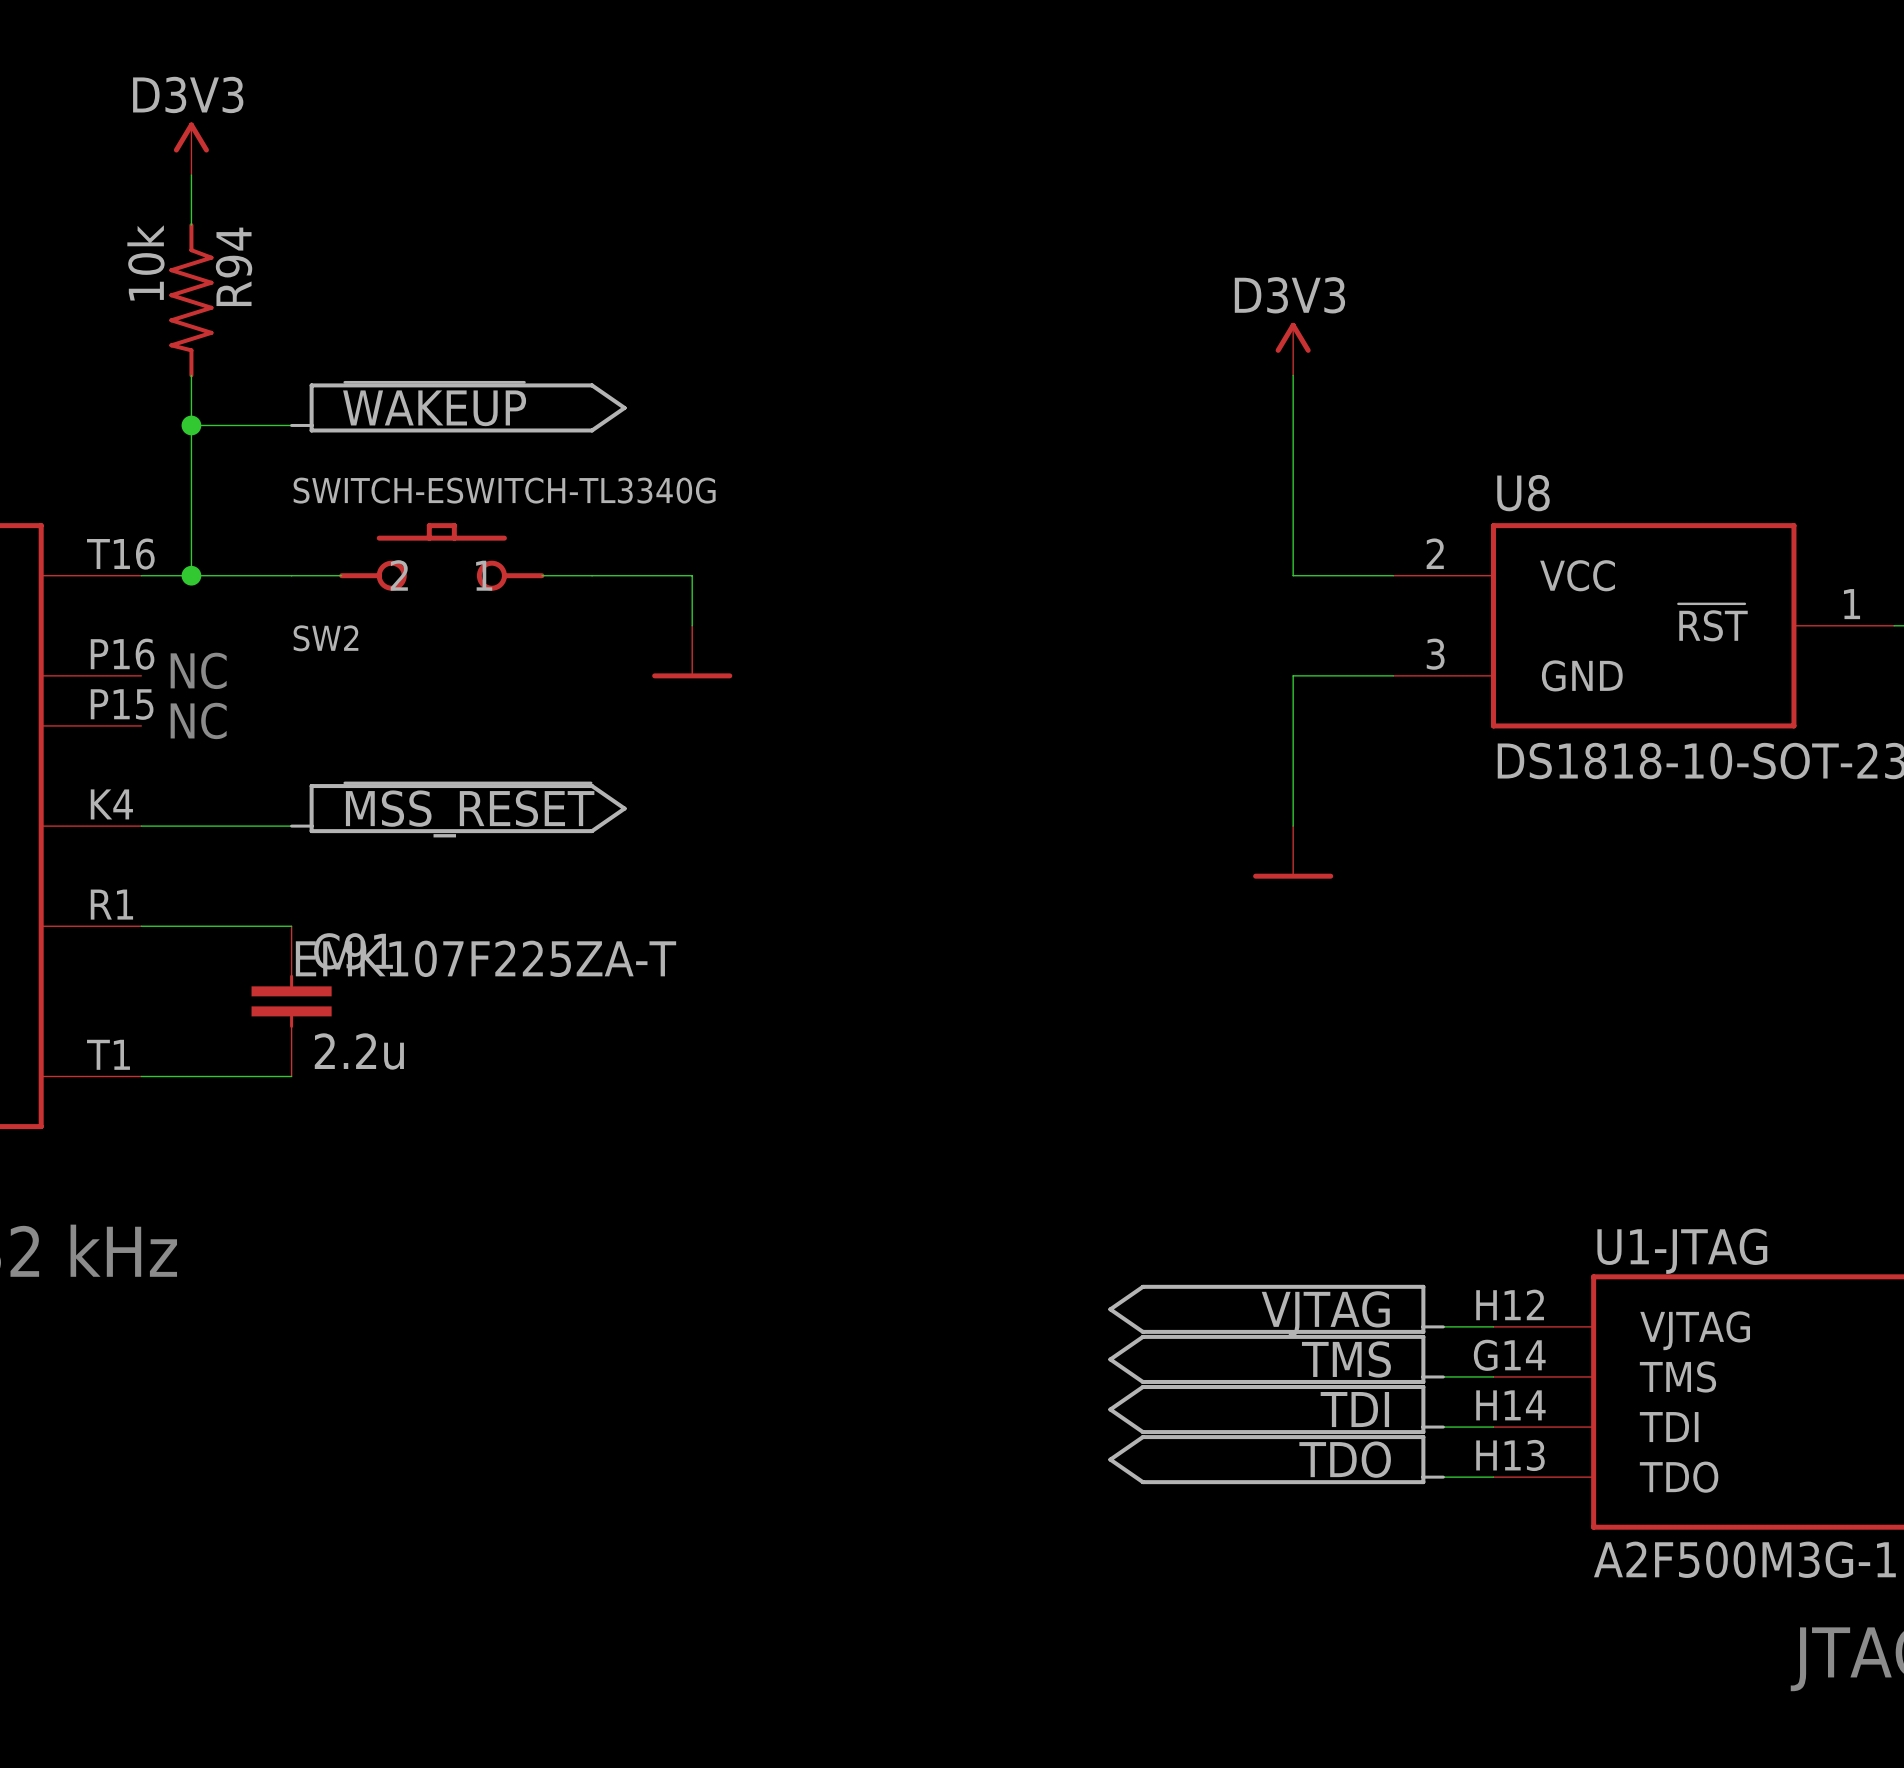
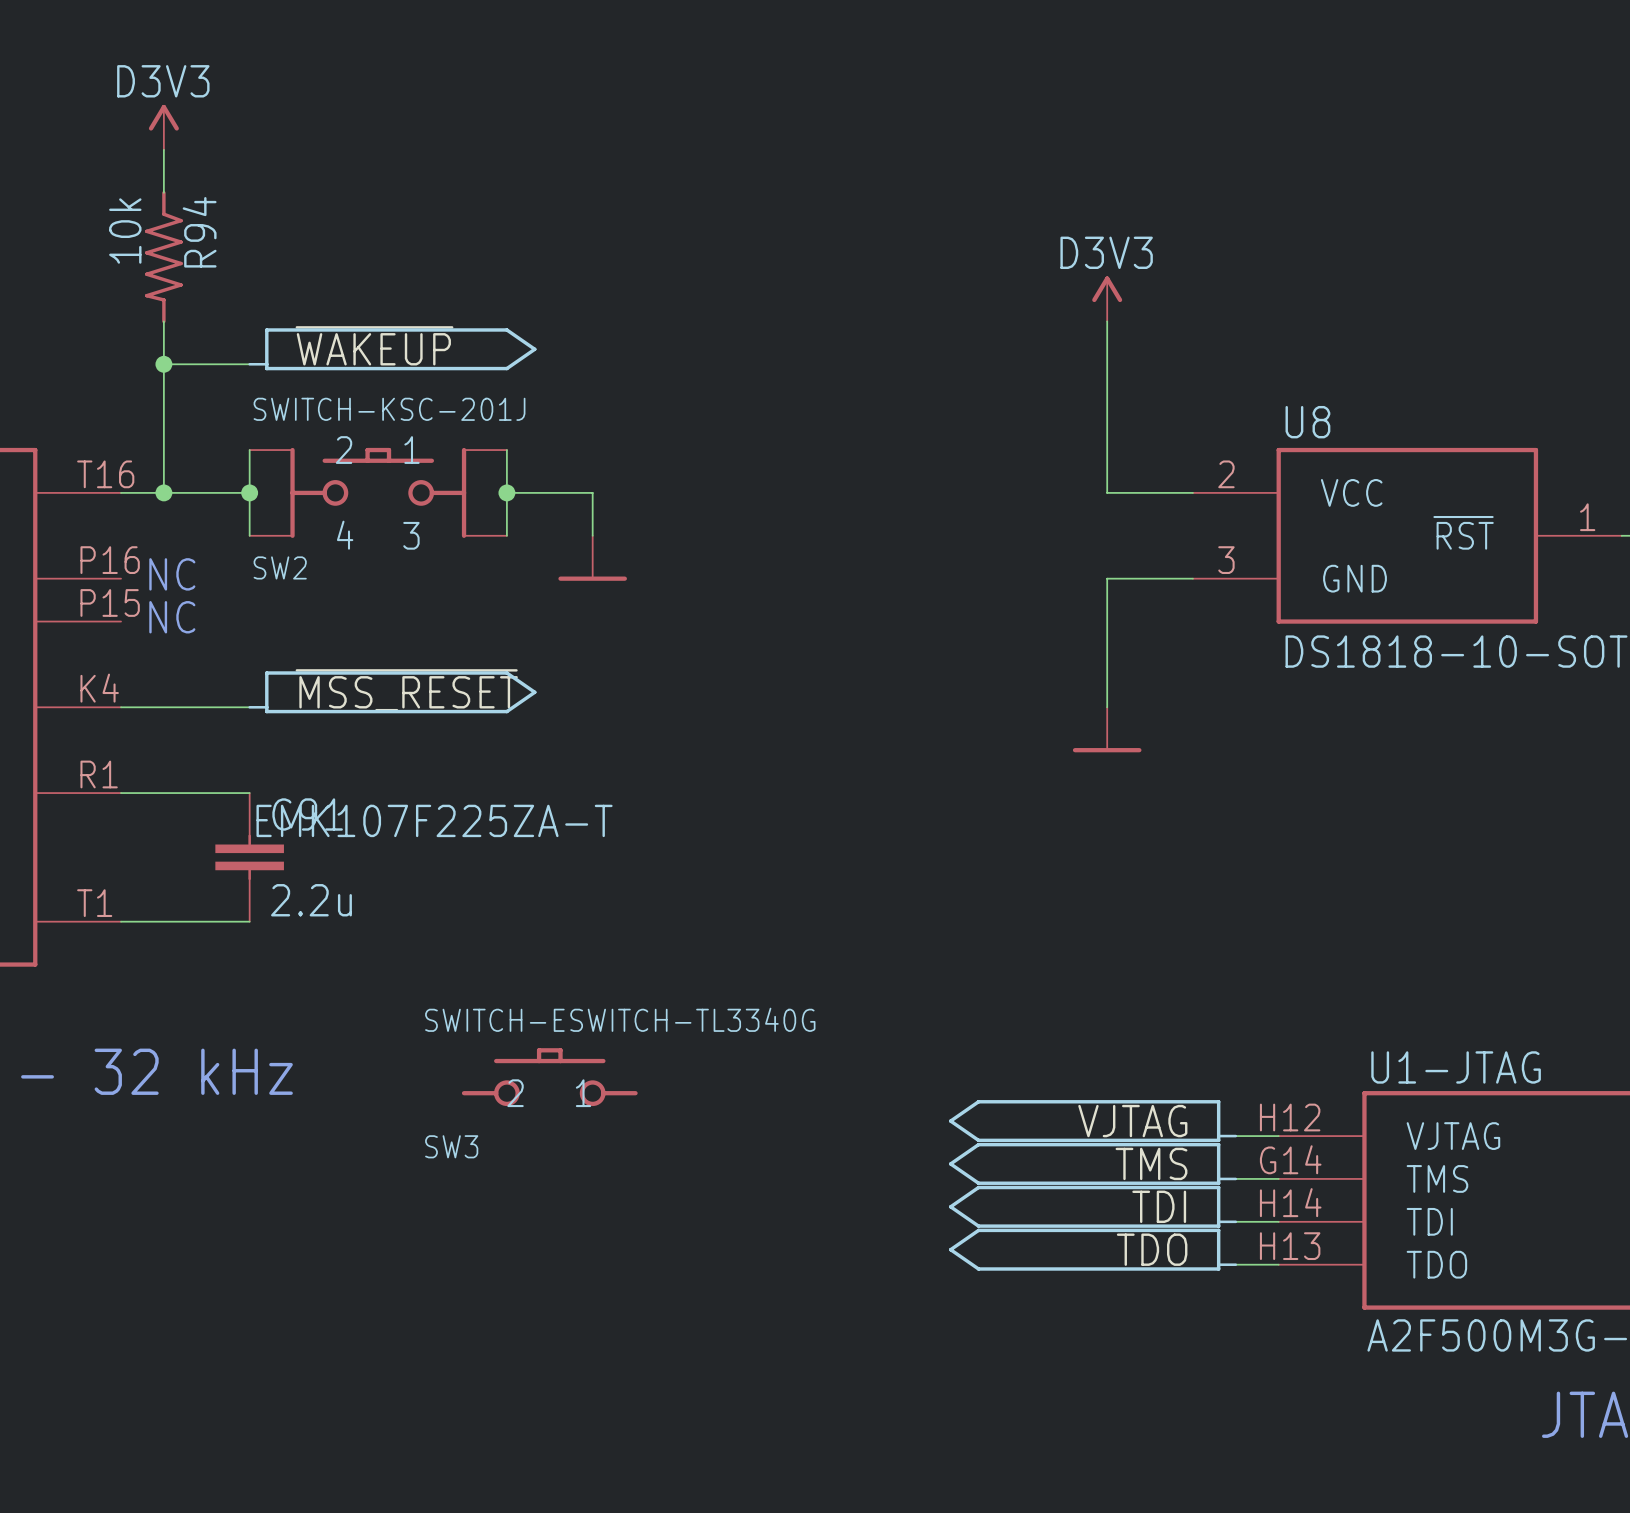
SW2 value: SWITCH-ESWITCH-TL3340G (504, 490) -> SWITCH-KSC-201J (389, 409)
SW2 symbol: [339, 523, 545, 591] -> [249, 447, 507, 538]
wire: none -> (249, 450) (249, 535)
wire: none -> (506, 450) (506, 535)
wire: (291, 575) (341, 575) -> none
junction: none -> (249, 492)
wire: (541, 575) (592, 575) -> none
junction: none -> (506, 492)
SW3: none -> SWITCH-ESWITCH-TL3340G (549, 1077)

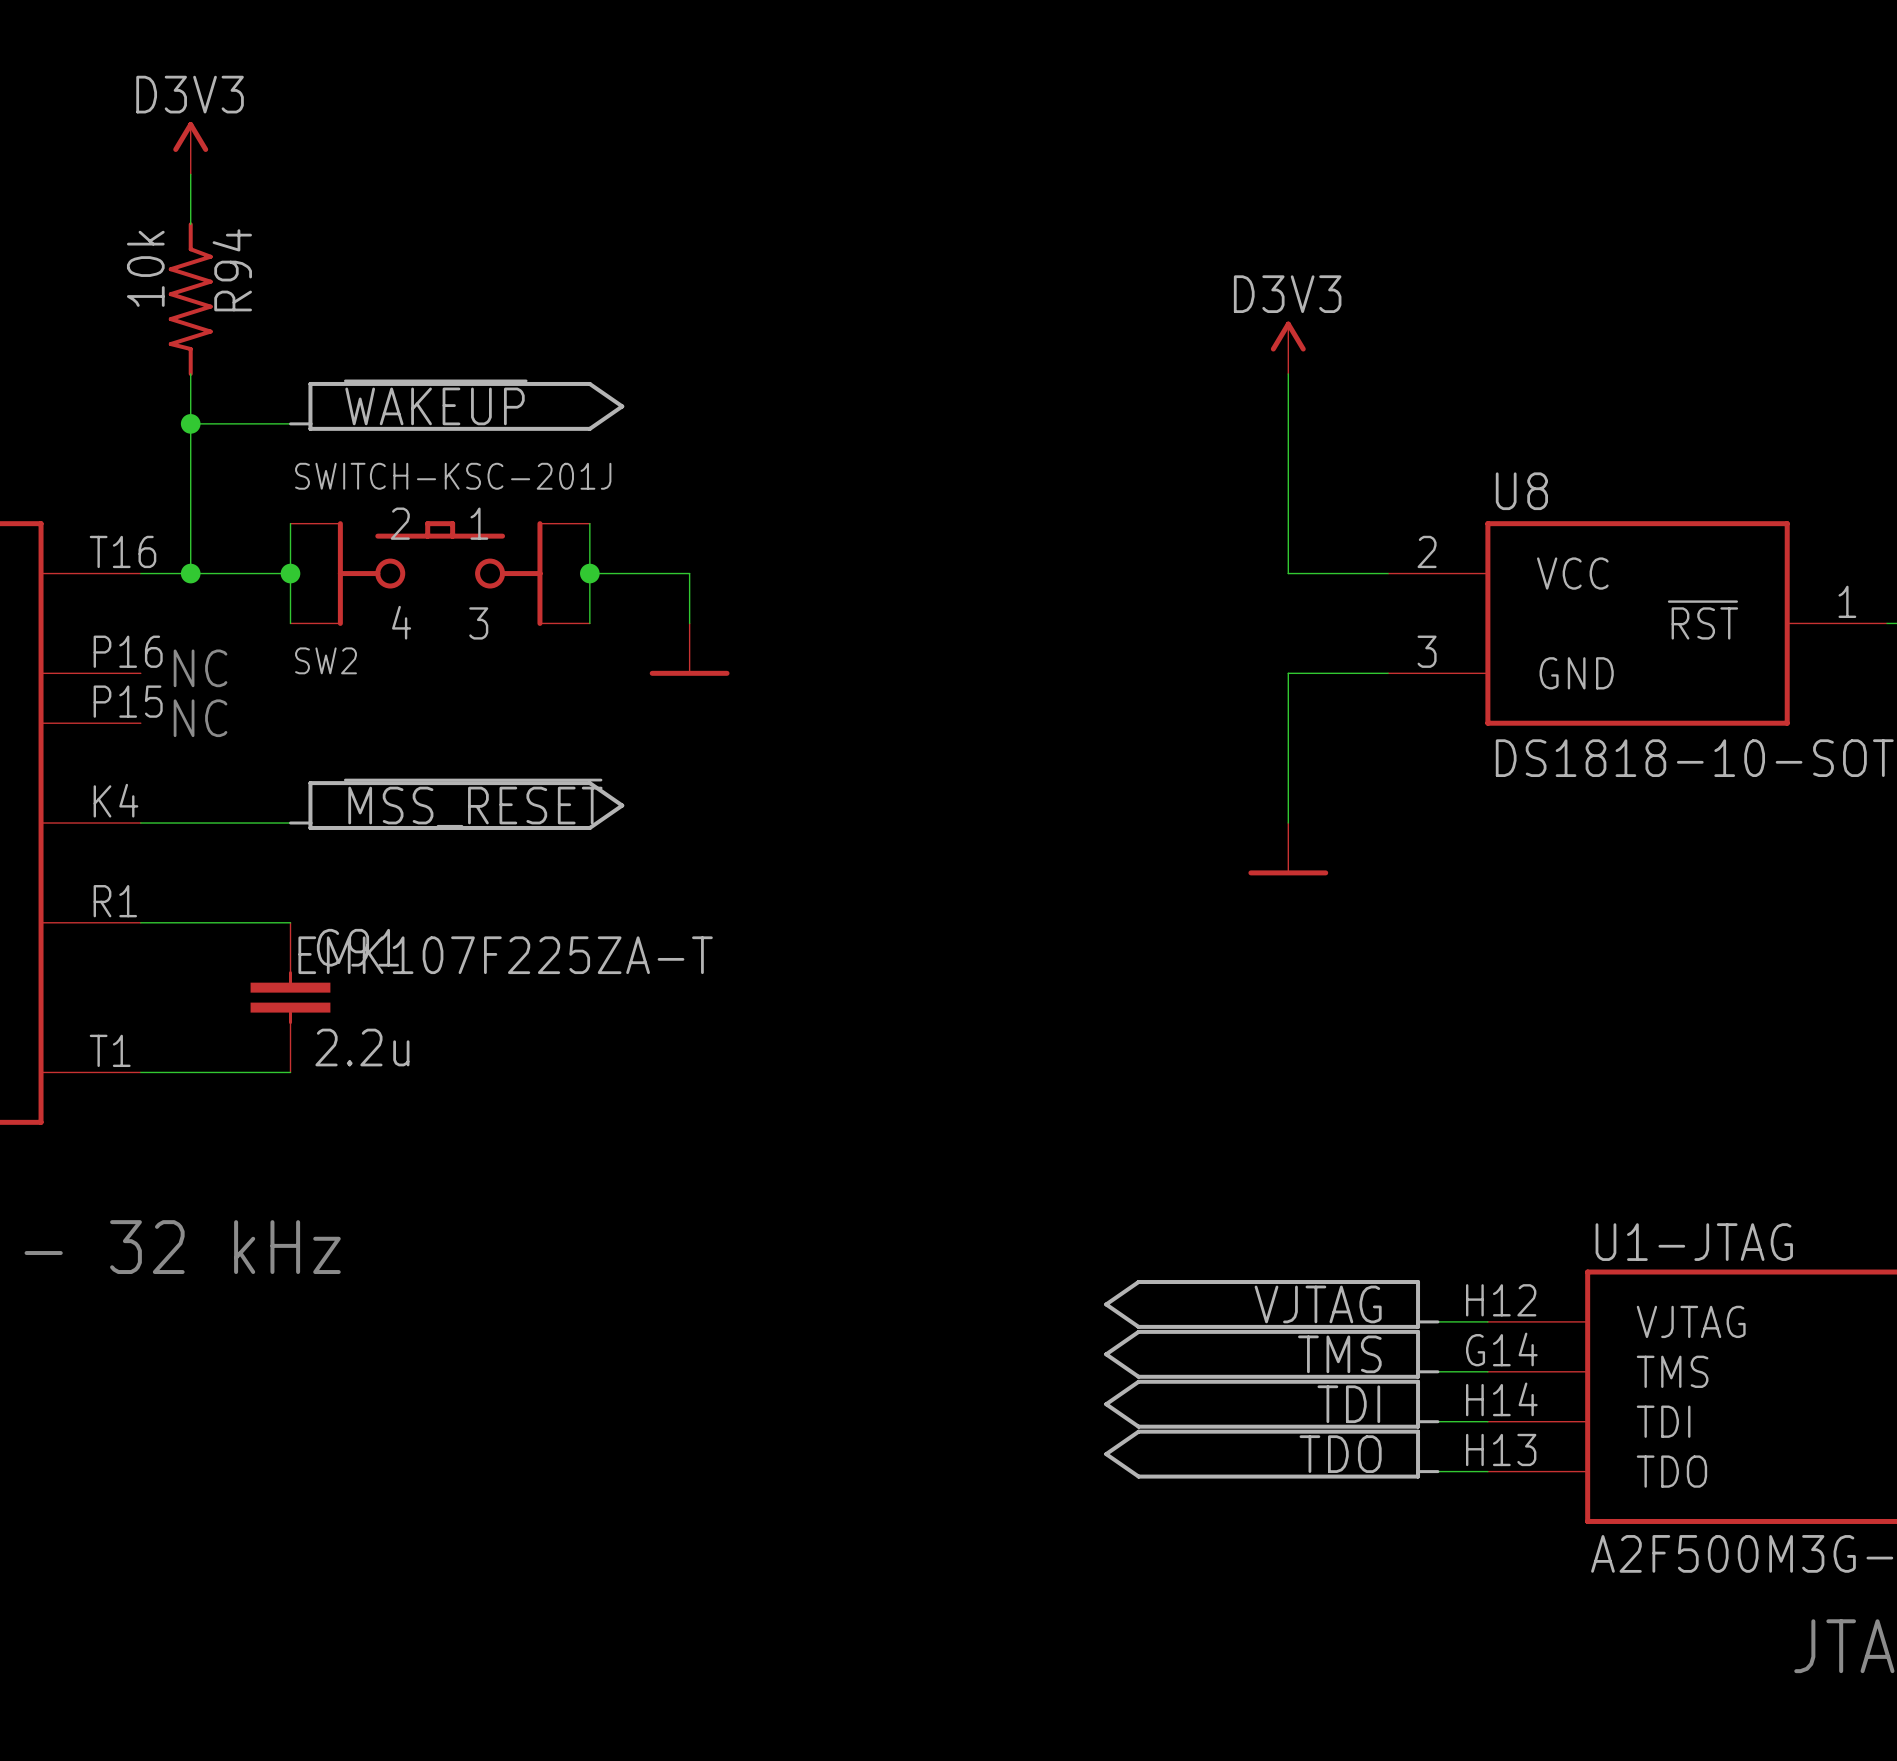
SW3: SWITCH-ESWITCH-TL3340G (549, 1077) -> none

